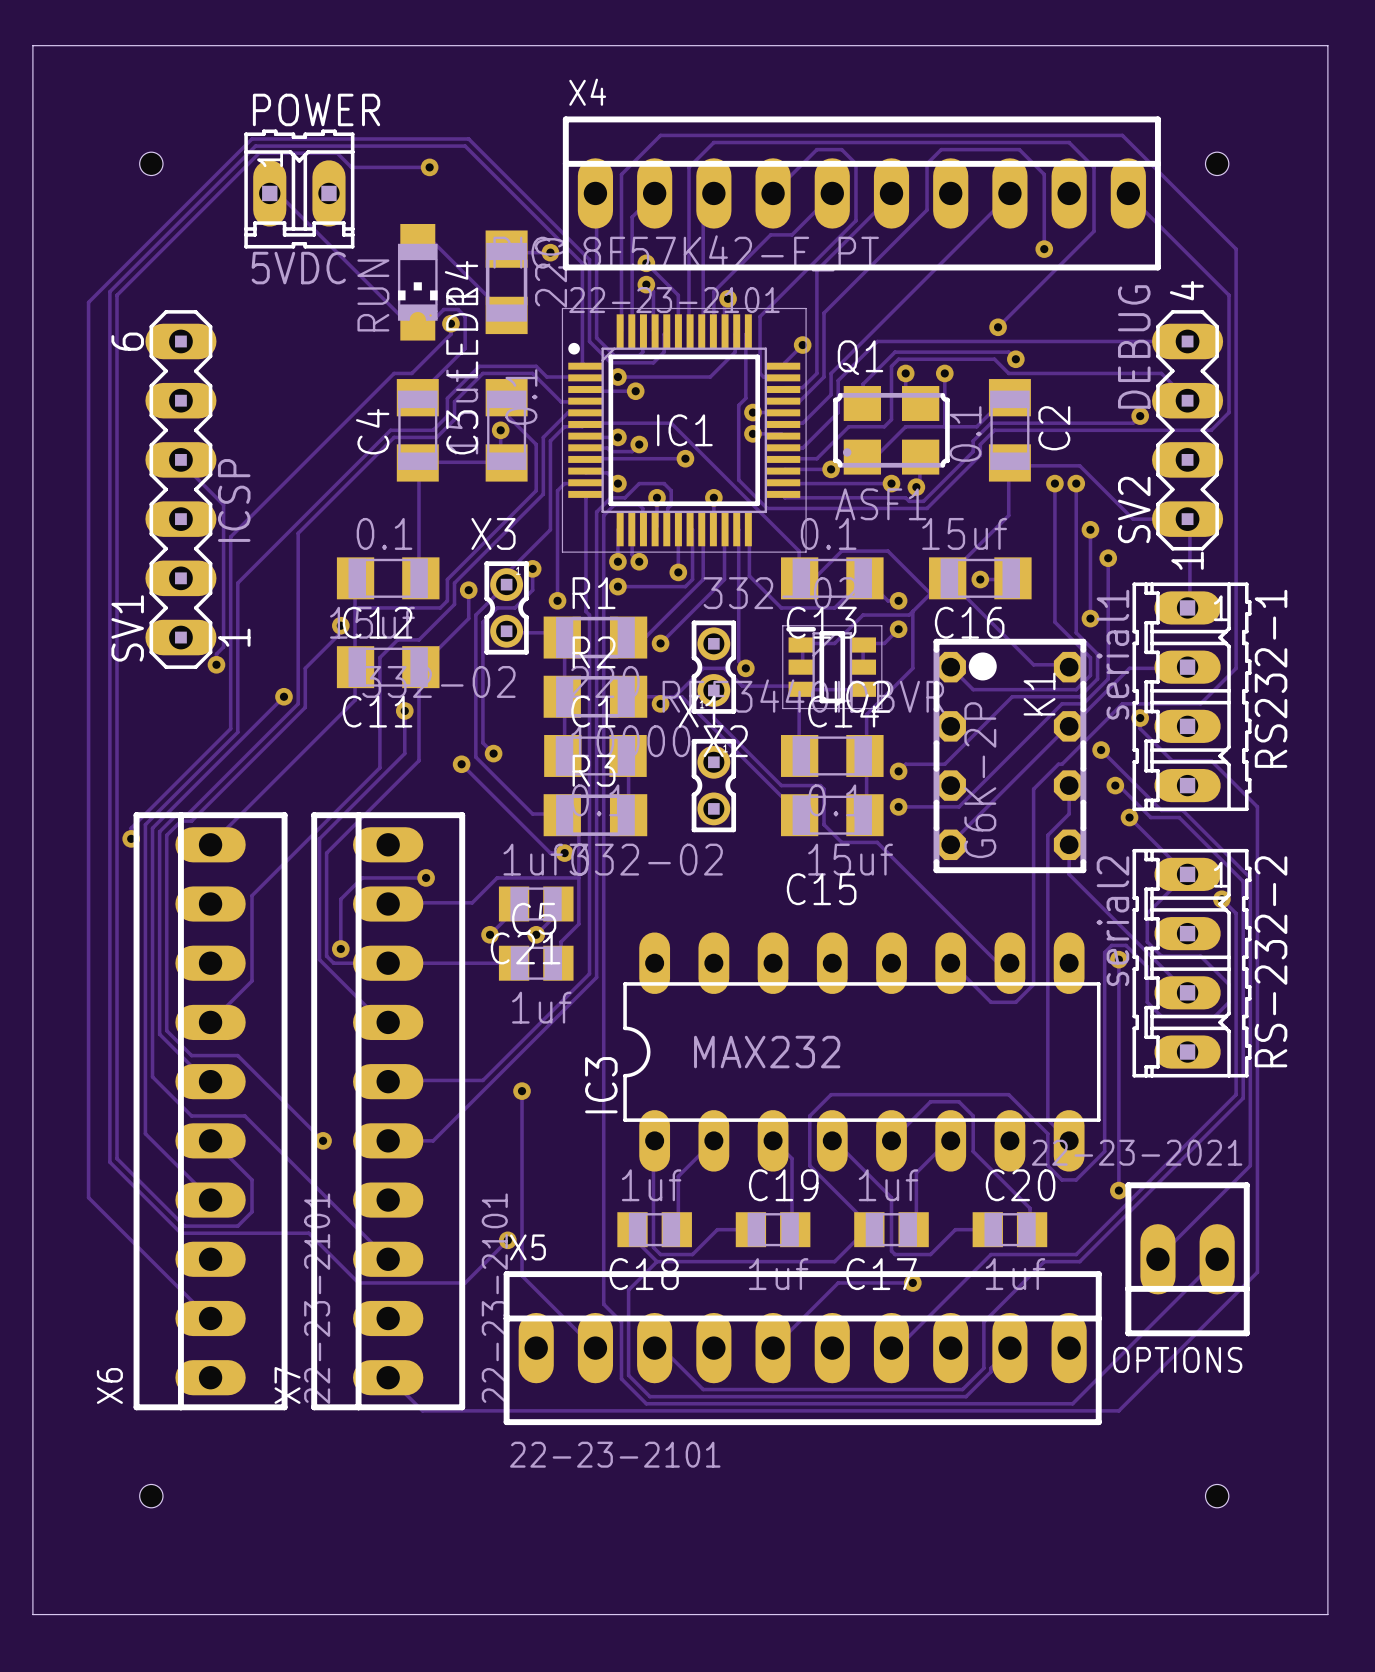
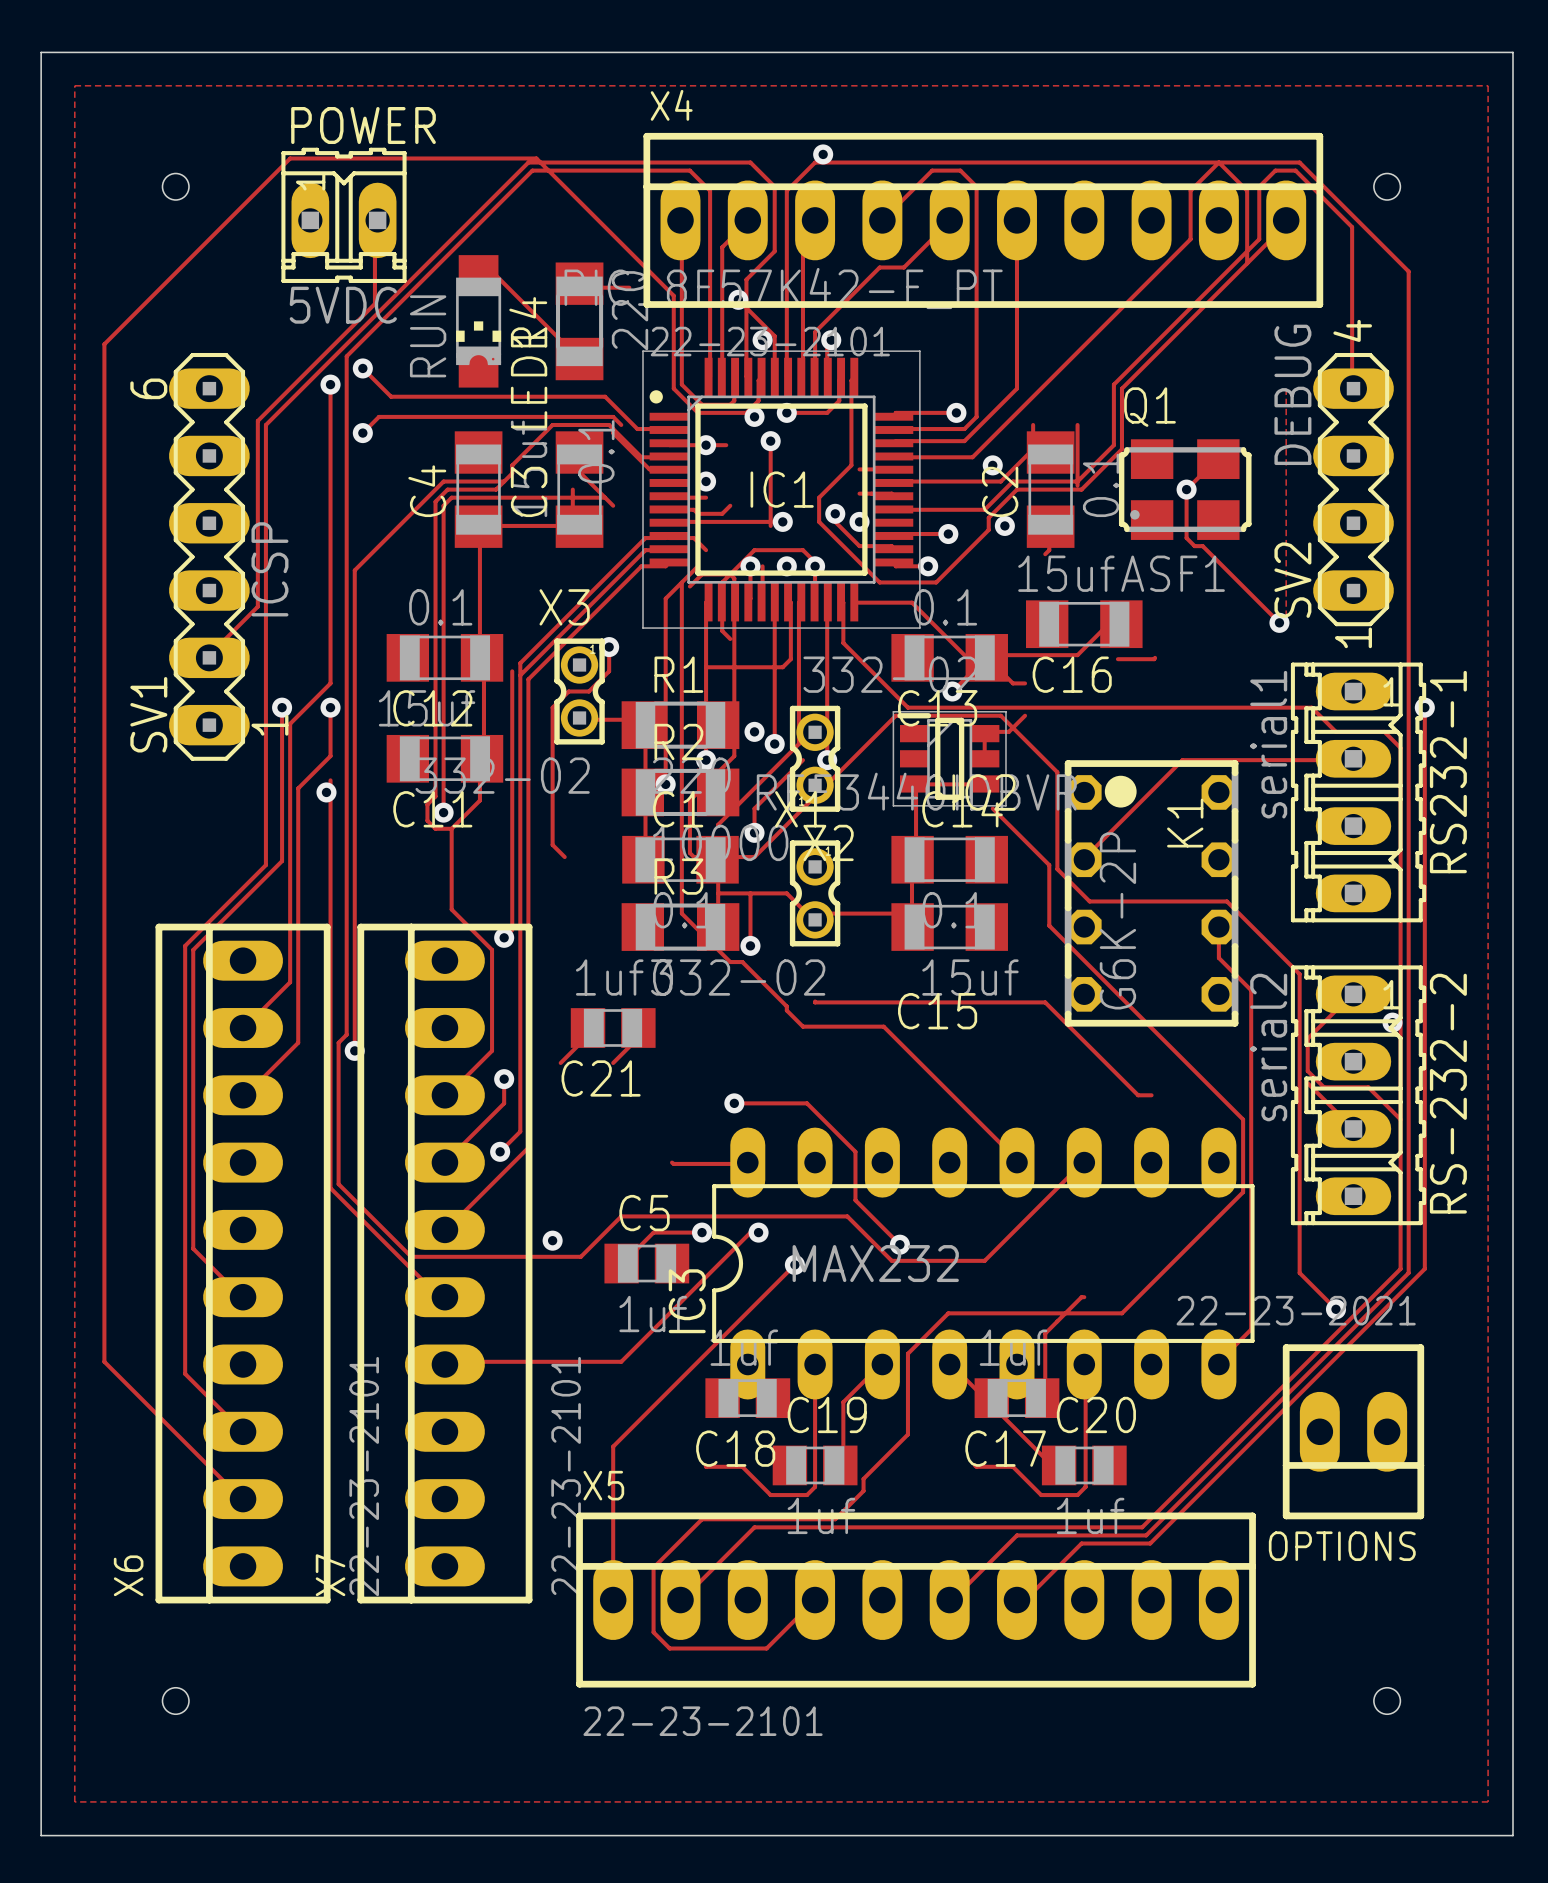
zone outline: none -> (74, 85) (1488, 85) (1488, 1801) (74, 1801) (74, 85)
via: none -> (823, 154)
track: (1136, 149) (1122, 135) (660, 135) (621, 174) -> (1084, 1162) (984, 1260) (891, 1260) (847, 1216) (621, 1216) (580, 1256) (411, 1256) (338, 1184) (338, 1042) (346, 1034) (346, 356) (532, 170) (689, 170) (710, 190) (710, 198)
track: (429, 167) (351, 167) (337, 153) (259, 153) (116, 295) (116, 1158) (184, 1226) (237, 1226) (252, 1211) (252, 1179) (212, 1140) (210, 1140) -> none
via: (429, 167) -> none
track: (1044, 174) (1019, 149) (941, 149) (927, 163) (927, 210) (824, 313) (824, 377) (799, 401) -> (1190, 239) (972, 457) (912, 457)
track: none -> (1190, 198) (1190, 190) (1218, 162) (1299, 162) (1408, 271) (1408, 283)
track: (269, 193) (269, 195) (280, 195) (404, 320) (415, 320) (417, 323) (418, 320) (433, 320) (443, 309) (458, 309) (465, 316) (465, 348) (417, 397) -> none
track: (1009, 193) (831, 373) (831, 394) (802, 423) -> (1050, 452) (1029, 453) (1000, 481) (916, 481)
track: (891, 195) (816, 270) (816, 373) (802, 387) -> (1016, 223) (1016, 388) (964, 441) (916, 441)
track: (1129, 195) (1229, 295) (1229, 412) (1211, 430) (994, 430) (980, 444) (980, 455) (927, 508) (767, 508) -> (1138, 372) (1121, 388) (1121, 449) (1081, 489) (1016, 489) (988, 517) (988, 529) (936, 582) (879, 582) (875, 578)
track: none -> (1287, 223) (1247, 263)
track: (1186, 199) (1236, 249) -> (1352, 227) (1352, 388)
track: (1044, 210) (1044, 249) -> none
track: (855, 220) (760, 316) (760, 373) (763, 377) (783, 377) -> (976, 251) (976, 416) (964, 429) (893, 429)
via: (1044, 249) -> none
via: (550, 252) -> none
via position: (646, 284) -> (762, 340)
via: none -> (362, 368)
track: (450, 323) (450, 334) (411, 373) (394, 373) (230, 536) -> (746, 332) (746, 279) (774, 251) (774, 186) (750, 162) (528, 162) (265, 424) (265, 610)
via: (450, 323) -> none
via: (998, 327) -> none
track: none -> (330, 384) (330, 683) (290, 723) (290, 982) (243, 1028)
via: none -> (330, 384)
zone outline: none -> (1286, 388) (1286, 624)
track: (1186, 341) (877, 341) (838, 380) (838, 412) (802, 448) -> none
track: (802, 345) (784, 362) -> (956, 412) (895, 412)
via: (802, 345) -> none
track: (1015, 359) (1008, 352) (895, 352) (863, 384) (862, 403) -> none
via: (1015, 359) -> none
via: none -> (786, 412)
track: (724, 362) (710, 377) (617, 377) -> (827, 412) (786, 412)
via: none -> (956, 412)
track: (479, 366) (447, 398) (447, 408) -> (548, 416) (378, 416) (362, 433)
track: (585, 366) (582, 362) (582, 263) (465, 146) (255, 146) (109, 291) (109, 1162) (180, 1233) (308, 1233) (358, 1282) (465, 1282) (507, 1240) -> none
via: none -> (754, 416)
track: (543, 373) (546, 377) (557, 377) -> (362, 368) (391, 396) (605, 396) (637, 429)
via: (905, 373) -> none
via: (944, 373) -> none
track: none -> (613, 429) (613, 433) (649, 469)
via position: (617, 377) -> (706, 445)
via: none -> (362, 433)
track: none -> (770, 441) (770, 525)
via: none -> (770, 441)
via: (635, 391) -> none
track: (1009, 397) (1008, 394) (976, 426) (905, 426) (877, 455) (863, 455) (862, 457) -> none
track: (745, 398) (738, 405) (738, 480) -> (851, 453) (851, 465) (819, 497) (819, 521) (843, 546)
track: (1187, 400) (1161, 373) (1008, 373) (994, 359) (898, 359) (891, 366) (891, 419) (887, 423) -> (1295, 170) (1275, 170) (1259, 186) (1259, 239) (1113, 384) (1113, 445) (1077, 481) (1012, 481)
track: (454, 401) (454, 419) (436, 437) -> (520, 457) (512, 465)
track: none -> (1218, 459) (1186, 489) (1186, 538) (1194, 546) (1202, 546) (1279, 622)
via: none -> (992, 465)
track: (568, 412) (543, 437) (543, 494) -> (669, 535) (665, 538) (645, 538) (621, 562)
via: (752, 412) -> none
track: (1140, 416) (1133, 423) (990, 423) (973, 440) (973, 451) (923, 501) (909, 501) (905, 497) (813, 497) -> none
via: (1140, 416) -> none
track: none -> (504, 481) (443, 481) (354, 570) (354, 1050)
track: (884, 426) (848, 426) (816, 458) (783, 459) -> (1008, 485) (984, 509) (916, 509)
C2 name position: C2 (1054, 428) -> C2 (1000, 491)
via: (500, 430) -> none
Q1 position: (891, 430) -> (1185, 489)
C2 position: (1009, 430) -> (1050, 489)
via: none -> (1186, 489)
via: (752, 433) -> none
C2 value position: 0.1 (965, 433) -> 0.1 (1101, 485)
track: none -> (500, 497) (605, 497)
via position: (617, 437) -> (706, 481)
track: (379, 440) (237, 583) (237, 732) (145, 824) (145, 1133) (210, 1200) -> none
track: (387, 444) (298, 533) (298, 703) (244, 757) -> (443, 505) (443, 812)
track: (536, 444) (536, 490) (447, 579) (447, 590) -> none
via: (639, 444) -> none
via: none -> (835, 513)
via: none -> (859, 521)
track: (180, 459) (180, 462) (223, 504) -> (377, 220) (374, 223) (374, 303) (257, 420) (257, 574)
via: none -> (1004, 525)
track: (783, 482) (891, 483) -> (893, 549) (891, 546) (859, 546) (835, 521) (835, 513)
via: (617, 483) -> none
track: (660, 483) (639, 483) (625, 497) (610, 497) -> (754, 550) (722, 582) (721, 601)
track: (664, 483) (671, 490) (671, 504) (667, 508) -> (762, 566) (762, 578)
track: none -> (758, 550) (802, 550) (819, 566)
via: (891, 483) -> none
track: (1054, 483) (1054, 622) (1090, 657) (1090, 675) (1076, 689) (973, 689) (950, 667) -> none
via: (1054, 483) -> none
track: (1076, 483) (1076, 632) (1097, 654) (1097, 678) (1079, 696) (1012, 696) (944, 764) (905, 764) (898, 771) -> none
via: (1076, 483) -> none
via: (916, 487) -> none
track: (557, 490) (557, 600) -> (637, 558) (520, 675)
track: (585, 494) (585, 611) (589, 615) (589, 973) (482, 1080) (390, 1080) -> (669, 562) (665, 566) (641, 566) (528, 679) (528, 1147) (447, 1228)
via: none -> (786, 566)
via: none -> (928, 566)
track: none -> (681, 582) (665, 598) (665, 784)
track: (603, 515) (603, 703) -> (735, 601) (734, 756) (689, 800)
track: (701, 529) (703, 579) (646, 636) (628, 637) -> (801, 601) (798, 602) (798, 743) (718, 826)
track: (749, 529) (749, 575) -> (843, 643) (855, 655)
track: none -> (855, 602) (912, 602) (976, 667) (988, 655) (1077, 655) (1105, 626) (1117, 626) (1121, 624)
track: (1090, 529) (1090, 618) -> none
via: (1090, 529) -> none
track: (223, 533) (223, 647) (216, 654) (216, 664) -> (257, 606) (209, 655) (209, 657)
track: (1108, 558) (1108, 678) (1083, 703) (1062, 703) (959, 806) (898, 806) -> none
via position: (1108, 558) -> (1279, 622)
track: none -> (706, 639) (706, 760)
via: (617, 561) -> none
via: (639, 561) -> none
track: (738, 565) (738, 661) (745, 668) -> none
track: none -> (774, 651) (774, 743)
via: (678, 572) -> none
track: (355, 578) (355, 700) (210, 844) -> none
track: (947, 578) (909, 615) (863, 615) (834, 643) (802, 643) (801, 667) -> none
track: (947, 578) (930, 593) (887, 551) (841, 551) (816, 575) (802, 575) (799, 578) (799, 551) (671, 423) (585, 423) (582, 426) (564, 426) (550, 440) (550, 529) (507, 572) (507, 583) (475, 615) (475, 757) (532, 814) (561, 814) (578, 831) (578, 924) (561, 941) (561, 963) (558, 963) -> none
track: (947, 578) (1008, 515) (1009, 462) (1012, 465) (1079, 465) (1133, 519) (1189, 519) (1189, 607) (1187, 607) -> none
track: (947, 578) (1033, 664) (1069, 664) (1069, 667) -> none
C16 position: (980, 578) -> (1084, 624)
track: (724, 579) (660, 643) -> (827, 659) (827, 760)
via: (980, 579) -> none
via: (617, 586) -> none
track: (468, 590) (468, 618) (422, 664) -> (482, 657) (483, 659) (483, 756)
via: (468, 590) -> none
track: (447, 600) (440, 607) (355, 607) -> (512, 683) (512, 929) (504, 937)
via: (557, 600) -> none
via: (898, 600) -> none
track: (454, 604) (418, 639) (397, 639) (379, 657) -> (435, 501) (435, 748)
track: none -> (520, 687) (520, 1131) (500, 1151)
track: (781, 607) (834, 607) -> (891, 691) (907, 707) (1311, 707) (1335, 731) (1384, 731) (1400, 748) (1400, 1119)
via: none -> (952, 691)
track: (912, 611) (912, 668) (866, 714) (866, 753) (864, 755) (866, 757) (866, 814) (864, 815) -> none
via: (1090, 618) -> none
track: none -> (282, 707) (282, 861)
via: none -> (282, 707)
track: none -> (330, 707) (330, 756) (298, 788) (298, 1042) (245, 1095) (243, 1095)
via: none -> (330, 707)
via: none -> (1424, 707)
track: (340, 625) (340, 632) (305, 668) (305, 707) (191, 821) (180, 821) -> none
via: (340, 625) -> none
via: (898, 629) -> none
via: none -> (774, 743)
via: (216, 664) -> none
via: none -> (706, 760)
track: (703, 668) (724, 668) (742, 686) (799, 686) (801, 689) (799, 689) (799, 755) -> none
via position: (745, 668) -> (827, 760)
track: (1129, 668) (1069, 728) (1069, 725) (950, 844) -> (1287, 760) (1182, 760) (1084, 859)
track: (1236, 668) (1200, 703) (1122, 703) (1062, 764) (1058, 764) (1033, 789) (1033, 984) (1015, 1002) (990, 1002) (950, 963) -> none
via: none -> (665, 784)
track: (713, 690) (713, 718) (781, 785) (820, 785) (824, 789) (824, 824) (841, 842) (877, 842) (916, 881) -> (815, 1001) (1045, 1002)
track: (283, 696) (152, 828) (152, 1076) (191, 1115) (244, 1115) (388, 1259) -> none
track: (628, 696) (681, 696) (799, 814) -> (916, 784) (916, 857) (912, 861) (912, 925)
track: none -> (770, 792) (754, 808) (754, 832)
track: (379, 700) (379, 767) (252, 895) (252, 980) (210, 1022) -> (435, 796) (427, 804) (427, 820) (435, 828) (451, 828)
track: (418, 703) (418, 760) (326, 853) (326, 956) (333, 963) (388, 963) -> (479, 800) (451, 828)
via: (660, 703) -> none
track: (404, 710) (404, 753) (319, 838) (319, 959) (379, 1020) (387, 1020) (388, 1022) -> (504, 1079) (504, 1103) (444, 1162)
via position: (404, 710) -> (443, 812)
track: none -> (992, 808) (1049, 865) (1049, 925) (1243, 1119) (1243, 1192) (1121, 1313) (948, 1313) (907, 1353) (907, 1434) (863, 1478) (863, 1491) (835, 1519) (702, 1519) (653, 1567) (653, 1632) (669, 1648) (766, 1648) (815, 1600)
track: (1140, 718) (1140, 728) (1172, 760) (1211, 760) (1257, 806) (1257, 1272) (1118, 1410) (422, 1410) (388, 1377) -> none
via: (1140, 718) -> none
track: (230, 728) (131, 828) (131, 838) -> (265, 828) (265, 865) (205, 925)
via: none -> (754, 832)
track: (603, 750) (603, 1304) (621, 1322) (621, 1378) (646, 1403) (1072, 1403) (1217, 1259) -> (689, 853) (693, 857) (754, 857) (895, 715) (1000, 715) (1057, 772) (1057, 869) (1089, 901) (1226, 901) (1299, 974) (1299, 1272) (1335, 1309)
track: (1101, 750) (1161, 810) (1182, 810) (1250, 877) -> (1424, 707) (1424, 998)
via: (1101, 750) -> none
via: (493, 753) -> none
K1 position: (1009, 755) -> (1151, 893)
track: (461, 764) (550, 853) (564, 853) -> none
via: (461, 764) -> none
via: (898, 771) -> none
track: none -> (718, 893) (786, 893) (807, 913) (912, 913) (912, 927)
track: none -> (750, 893) (750, 945)
track: (1069, 785) (1069, 814) (1047, 835) (1047, 1119) (1069, 1140) -> none
track: (1115, 785) (1118, 785) (1150, 817) (1179, 817) (1243, 881) (1243, 1098) (1079, 1261) (1044, 1261) (983, 1322) (983, 1368) (962, 1389) (703, 1389) (664, 1350) (657, 1350) (654, 1348) -> none
via: (1115, 785) -> none
track: (596, 803) (596, 977) (433, 1140) (388, 1140) -> (330, 780) (330, 1188) (439, 1297) (444, 1297)
track: none -> (681, 913) (730, 962) (742, 962) (786, 1006) (786, 1010) (802, 1026) (883, 1026) (1016, 1159) (1016, 1162)
via: (898, 806) -> none
track: none -> (1218, 927) (1218, 958) (1251, 990) (1251, 1329) (1218, 1361) (1218, 1364)
track: (1129, 817) (1187, 874) -> none
via: (1129, 817) -> none
via: none -> (504, 937)
via: none -> (750, 945)
via: (131, 838) -> none
track: (1069, 844) (1069, 874) (1147, 952) -> none
via: (564, 853) -> none
track: (426, 877) (362, 877) (340, 899) (340, 949) -> none
via: (426, 877) -> none
track: (578, 877) (497, 877) (472, 902) (388, 904) -> none
track: (1221, 899) (1236, 913) -> (1408, 760) (1408, 1038)
via: (490, 934) -> none
via: (536, 934) -> none
via position: (340, 949) -> (354, 1050)
via: none -> (504, 1079)
track: (1118, 959) (1118, 1190) -> none
via: (1118, 959) -> none
track: (390, 963) (514, 963) -> (447, 1095) (492, 1050) (492, 949) (451, 909) (451, 828)
C5 position: (536, 963) -> (646, 1263)
track: none -> (734, 1103) (807, 1103) (855, 1151) (855, 1200) (899, 1244)
via: none -> (734, 1103)
track: (1229, 1002) (1214, 1016) (1161, 1016) (1147, 1002) (1147, 966) (1125, 945) (1111, 945) (1104, 952) (1104, 1151) (1076, 1179) (1062, 1179) (1047, 1165) (1047, 1133) (1008, 1094) (831, 1094) (809, 1115) (809, 1165) (866, 1222) (866, 1229) (834, 1261) (657, 1261) -> (1400, 1139) (1400, 1268) (1142, 1527) (754, 1527) (680, 1600)
via: none -> (500, 1151)
track: none -> (672, 1162) (747, 1162)
track: (166, 1030) (191, 1055) (237, 1055) (323, 1140) -> (193, 1172) (193, 1248) (243, 1297)
track: (159, 1034) (209, 1084) (210, 1081) -> (185, 1176) (185, 1373) (243, 1431)
IC3 position: (861, 1052) -> (983, 1263)
track: none -> (702, 1232) (653, 1232) (621, 1263)
via: none -> (702, 1232)
track: none -> (758, 1232) (750, 1232) (621, 1361) (447, 1361) (444, 1364)
via: none -> (758, 1232)
track: (522, 1091) (522, 1275) (595, 1348) -> none
via position: (522, 1091) -> (552, 1240)
via: none -> (899, 1244)
track: (1236, 1094) (1076, 1254) (990, 1254) (898, 1346) (891, 1348) -> (1408, 1244) (1408, 1272) (1146, 1535) (1016, 1535) (952, 1600) (949, 1600)
track: none -> (794, 1264) (613, 1446) (613, 1600)
via: none -> (794, 1264)
track: (1250, 1115) (1250, 1165) (1157, 1259) -> (1424, 1268) (1150, 1543) (1081, 1543) (1025, 1600) (1016, 1600)
via: (323, 1140) -> none
track: (654, 1140) (653, 1247) (660, 1254) (692, 1254) (717, 1229) (750, 1229) -> none
track: (713, 1140) (678, 1176) (678, 1229) (676, 1229) -> none
track: (773, 1140) (792, 1158) (792, 1229) (795, 1229) -> none
track: (832, 1140) (834, 1140) (891, 1197) -> none
track: (891, 1140) (930, 1101) (959, 1101) (973, 1115) (973, 1151) (1030, 1208) (1030, 1229) (1032, 1229) -> none
via position: (1118, 1190) -> (1335, 1309)
track: none -> (815, 1364) (815, 1486) (807, 1495) (770, 1495) (742, 1466) (705, 1465)
track: none -> (882, 1364) (843, 1402) (843, 1462) (840, 1465)
track: none -> (949, 1364) (1049, 1462) (1057, 1462) (1059, 1465)
track: (891, 1200) (891, 1250) (895, 1254) (930, 1254) (955, 1229) (987, 1229) -> none
track: none -> (1084, 1364) (1085, 1486) (1077, 1495) (1041, 1495) (1012, 1466) (974, 1465)
track: (632, 1229) (635, 1229) (635, 1240) (657, 1261) -> none
C19 position: (773, 1229) -> (815, 1465)
C20 position: (1009, 1229) -> (1084, 1465)
via: (507, 1240) -> none
track: (657, 1261) (628, 1290) (628, 1375) (649, 1396) (966, 1396) (990, 1371) (990, 1368) (1009, 1348) -> none
track: (912, 1282) (838, 1282) (773, 1348) -> none
via: (912, 1282) -> none
X5 position: (802, 1348) -> (916, 1600)

